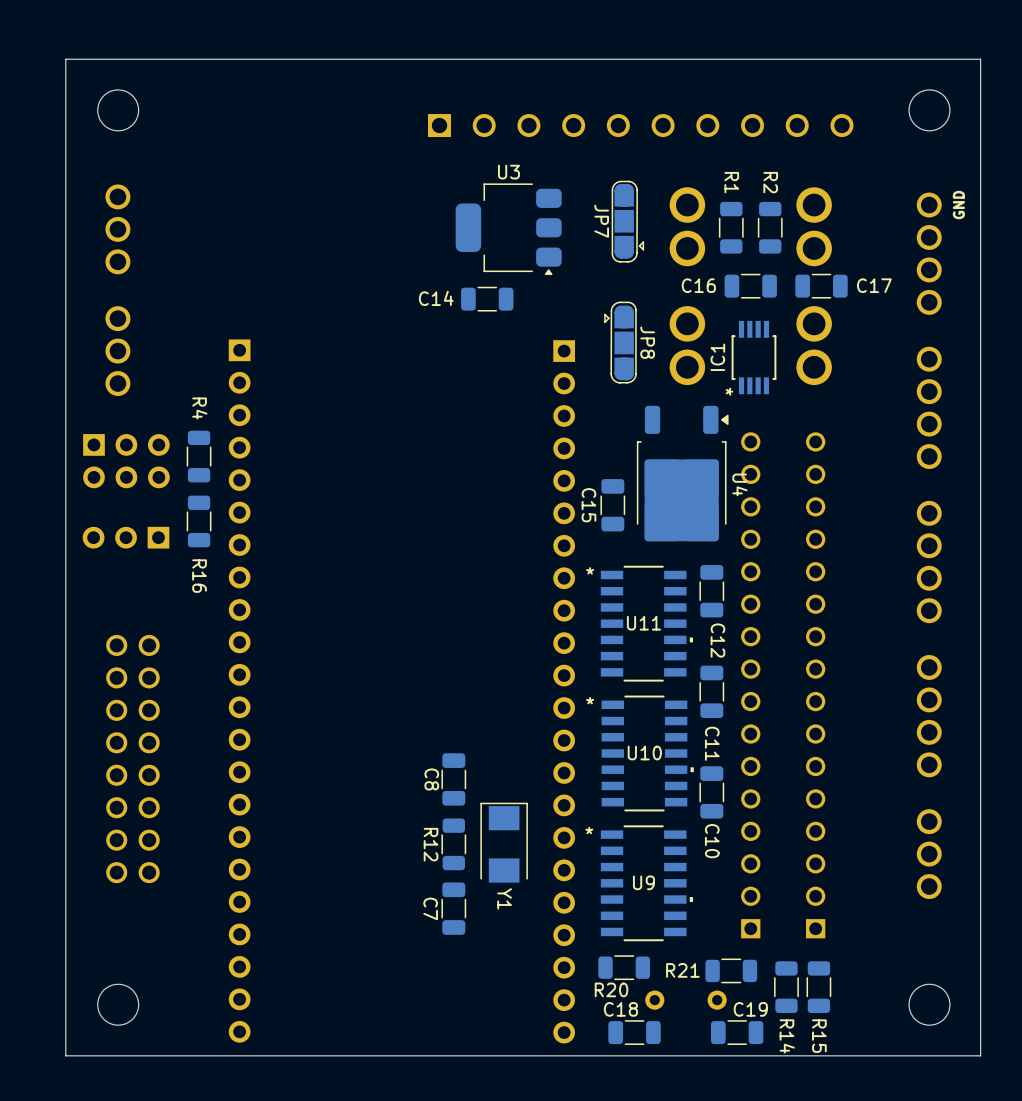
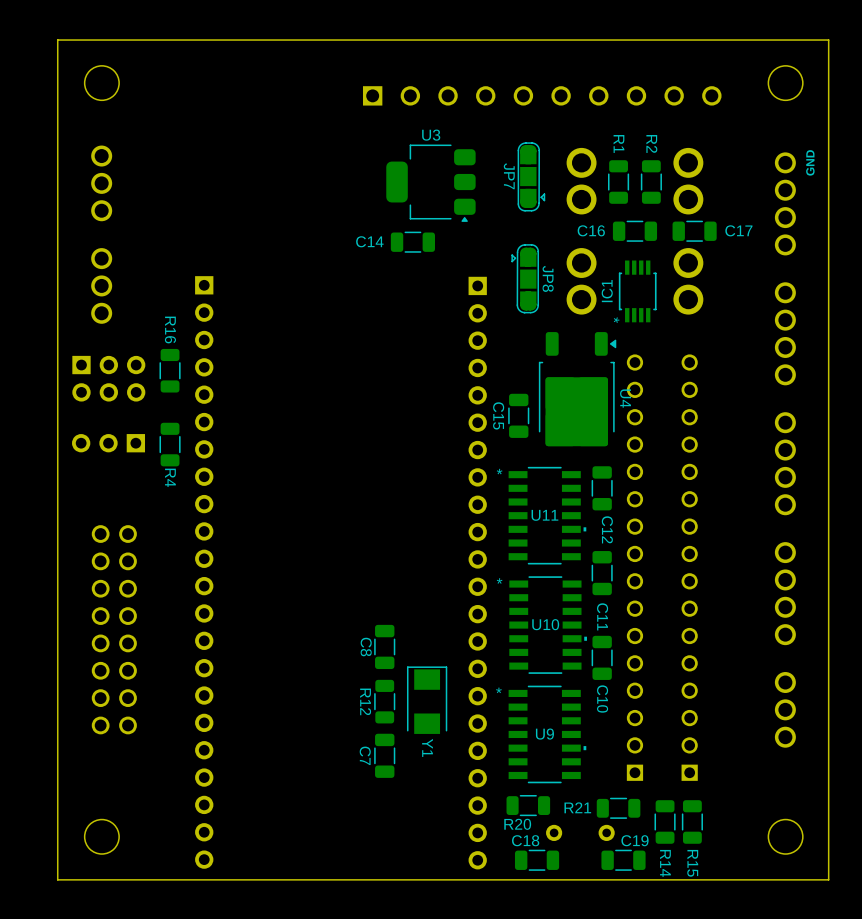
R4 name position: R4 (199, 408) -> R4 (170, 477)
R4 position: (199, 456) -> (170, 444)
R16 position: (199, 521) -> (170, 370)
R16 name position: R16 (199, 576) -> R16 (170, 330)

